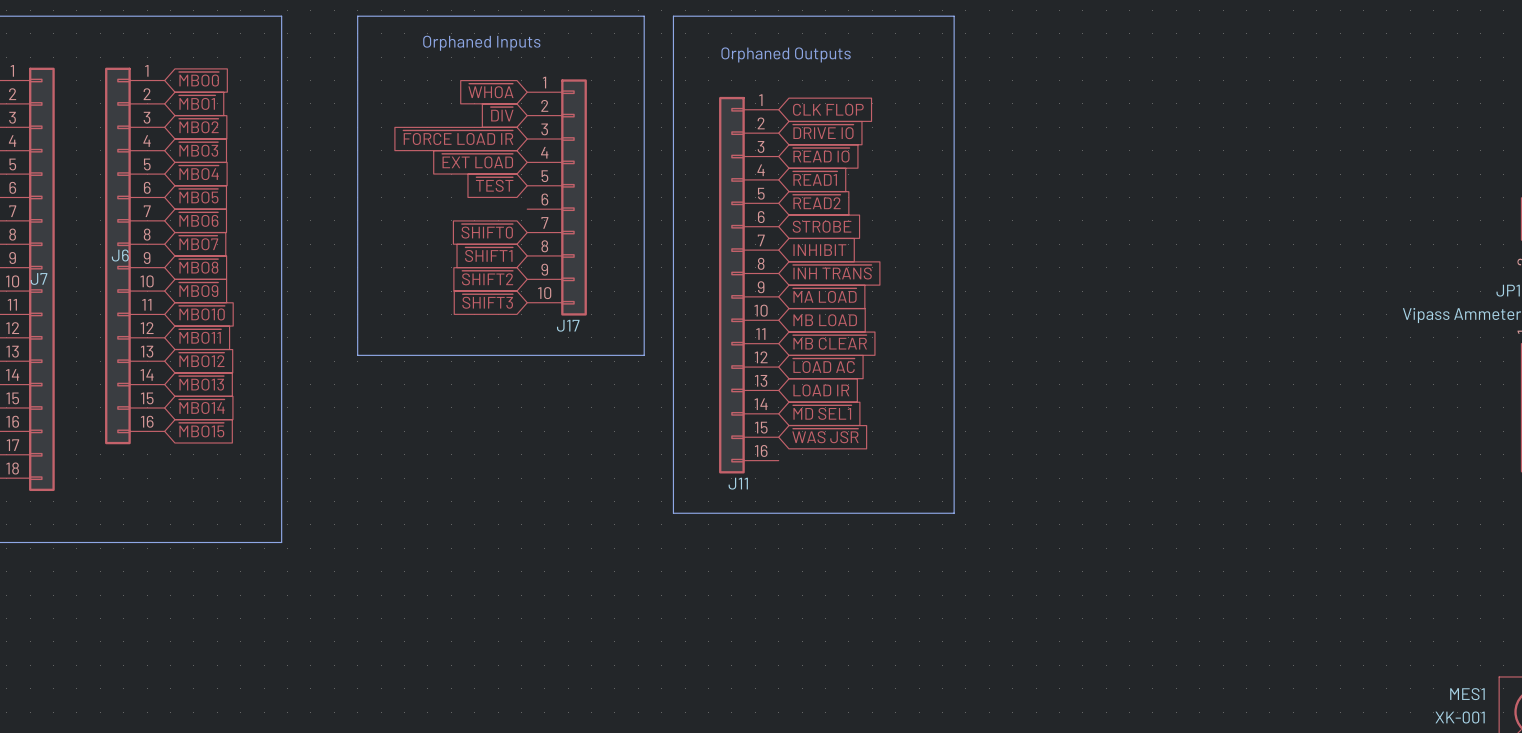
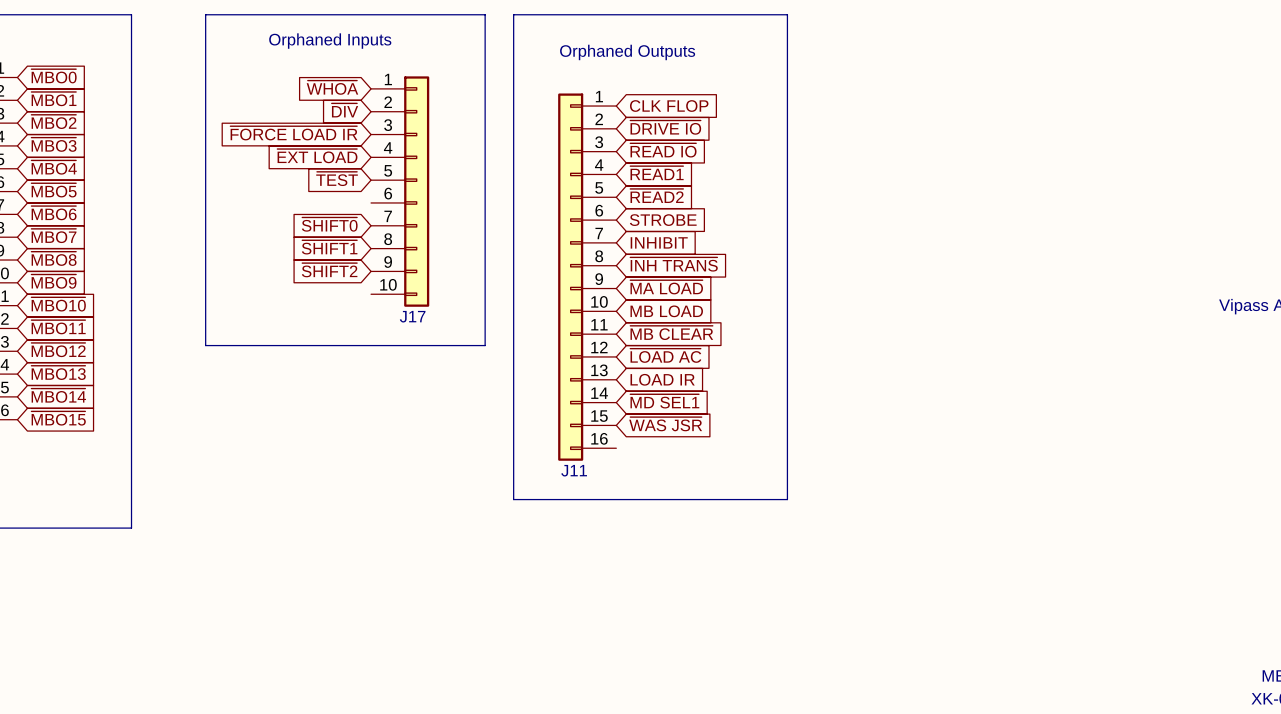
global label: ~{SHIFT3} (487, 301) -> none

